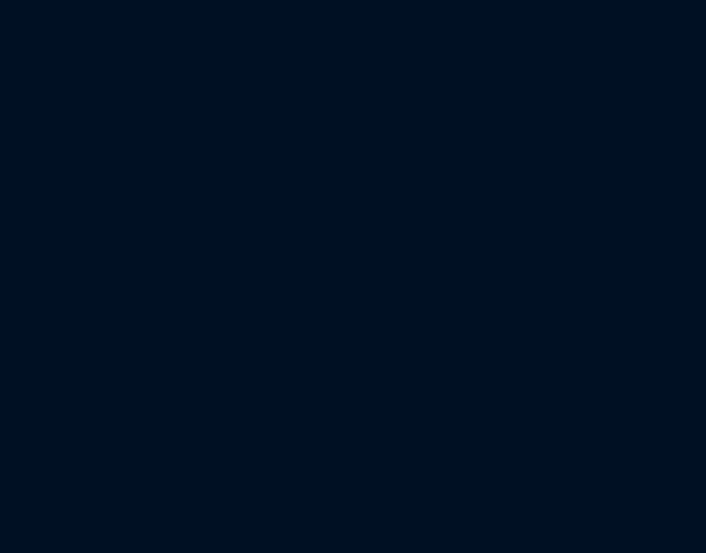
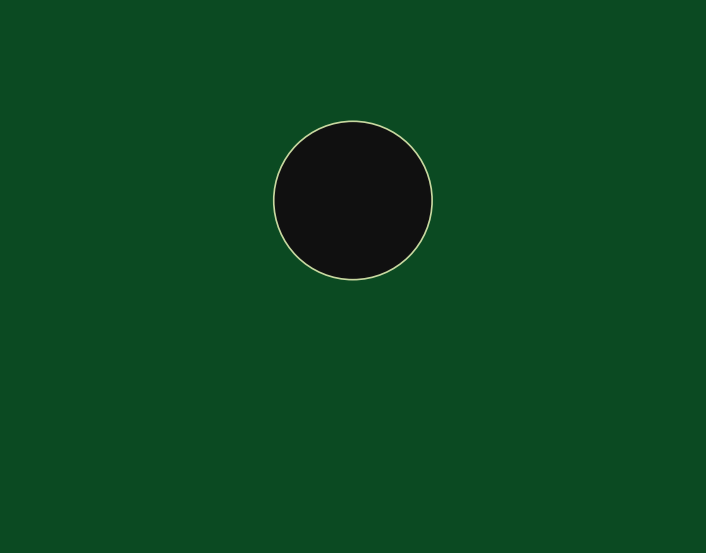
part: none -> (352, 200)

